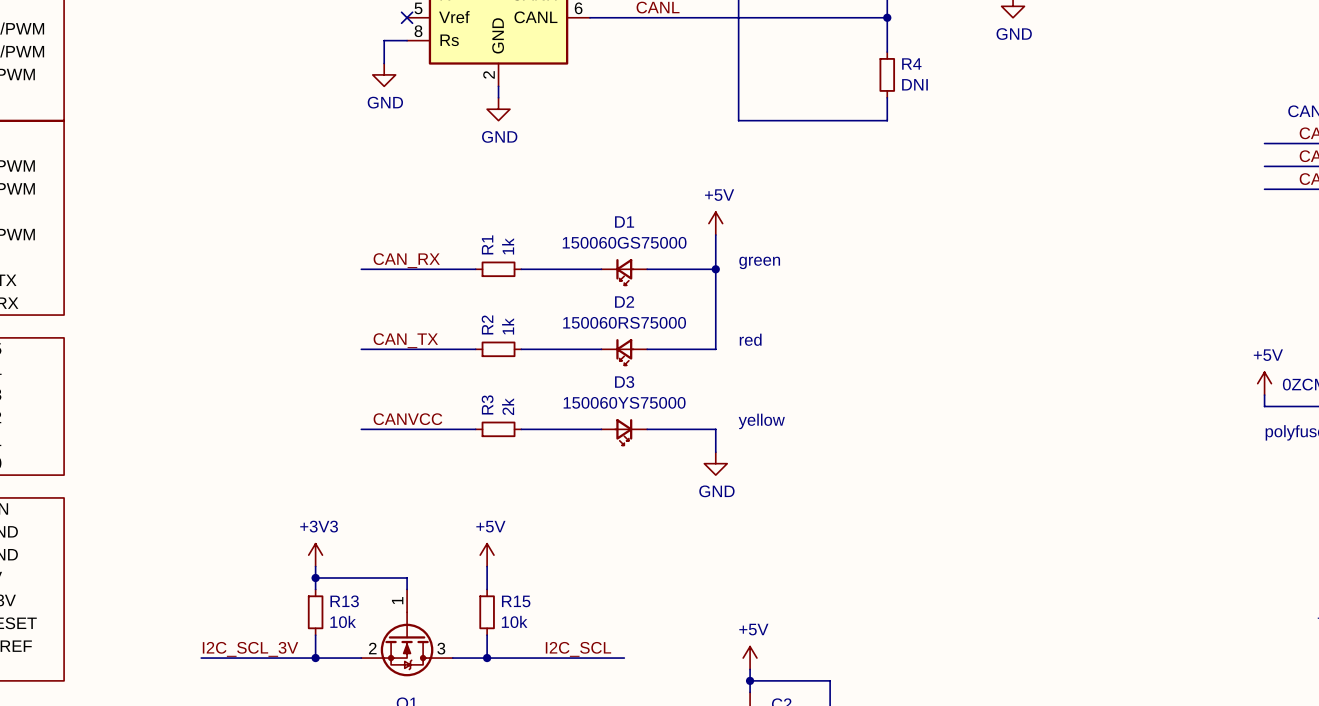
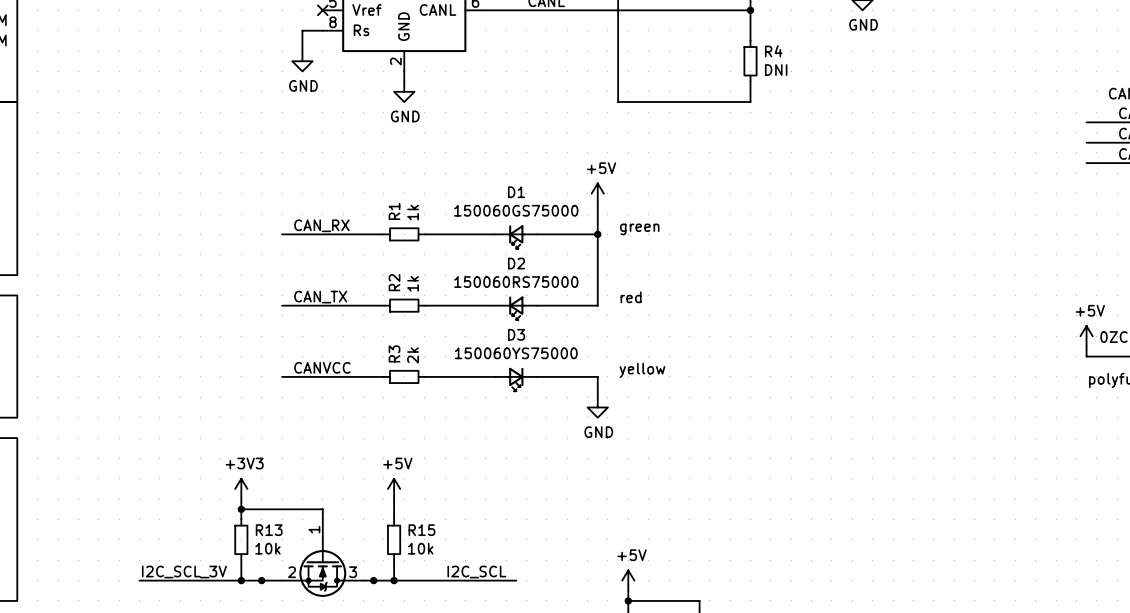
junction: none -> (261, 580)
junction: none -> (373, 580)

